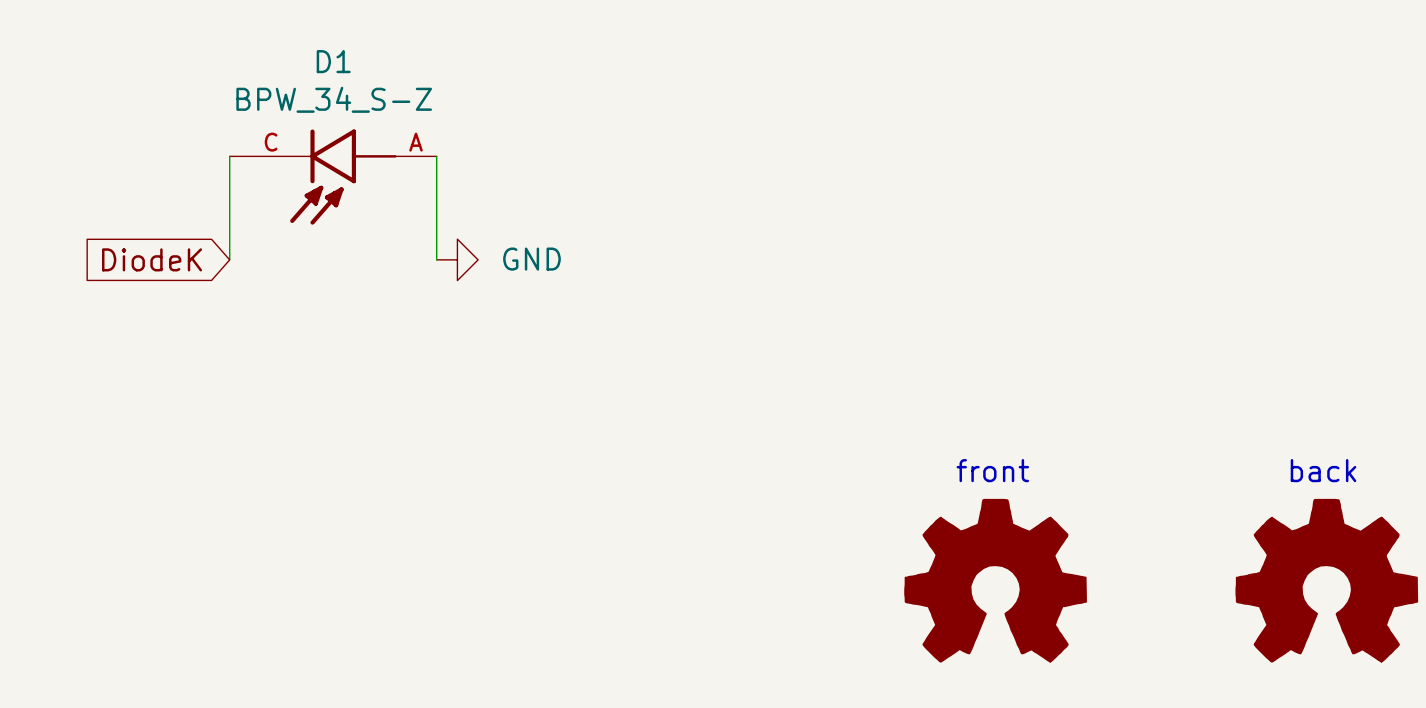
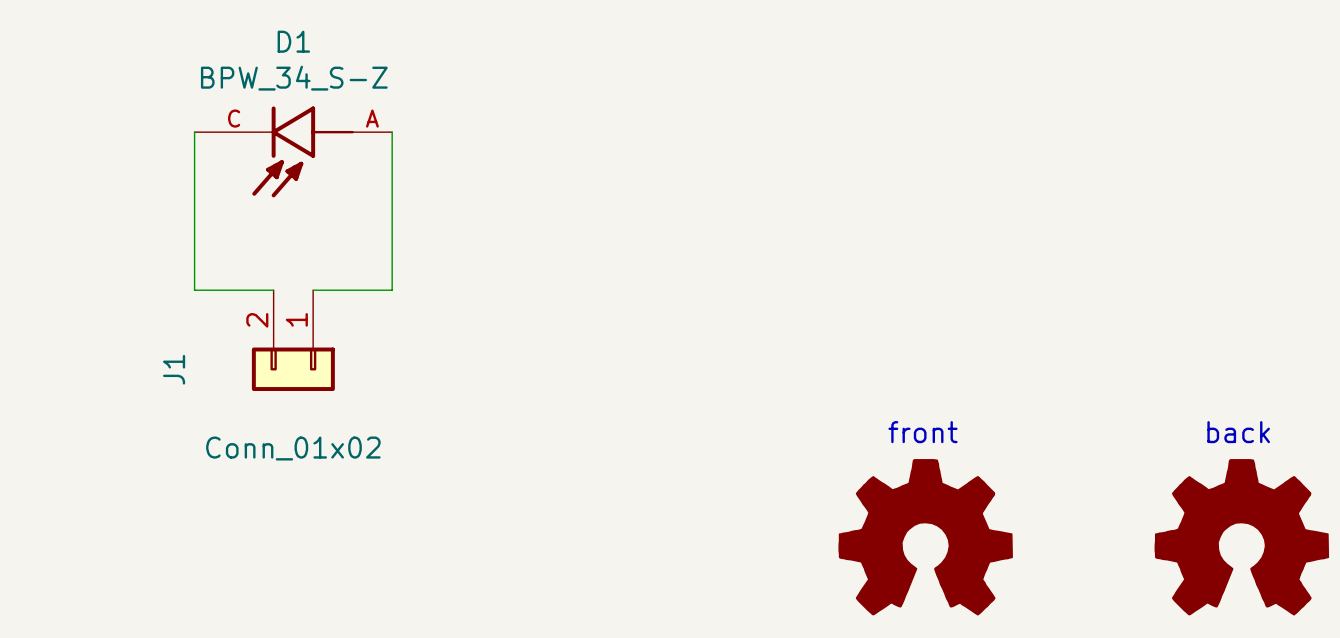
global label: DiodeK (152, 259) -> none
wire: none -> (194, 230) (194, 290) (273, 290)
wire: none -> (392, 230) (392, 290) (313, 290)
power symbol: GND (457, 259) -> none
J1: none -> Conn_01x02 (293, 340)

